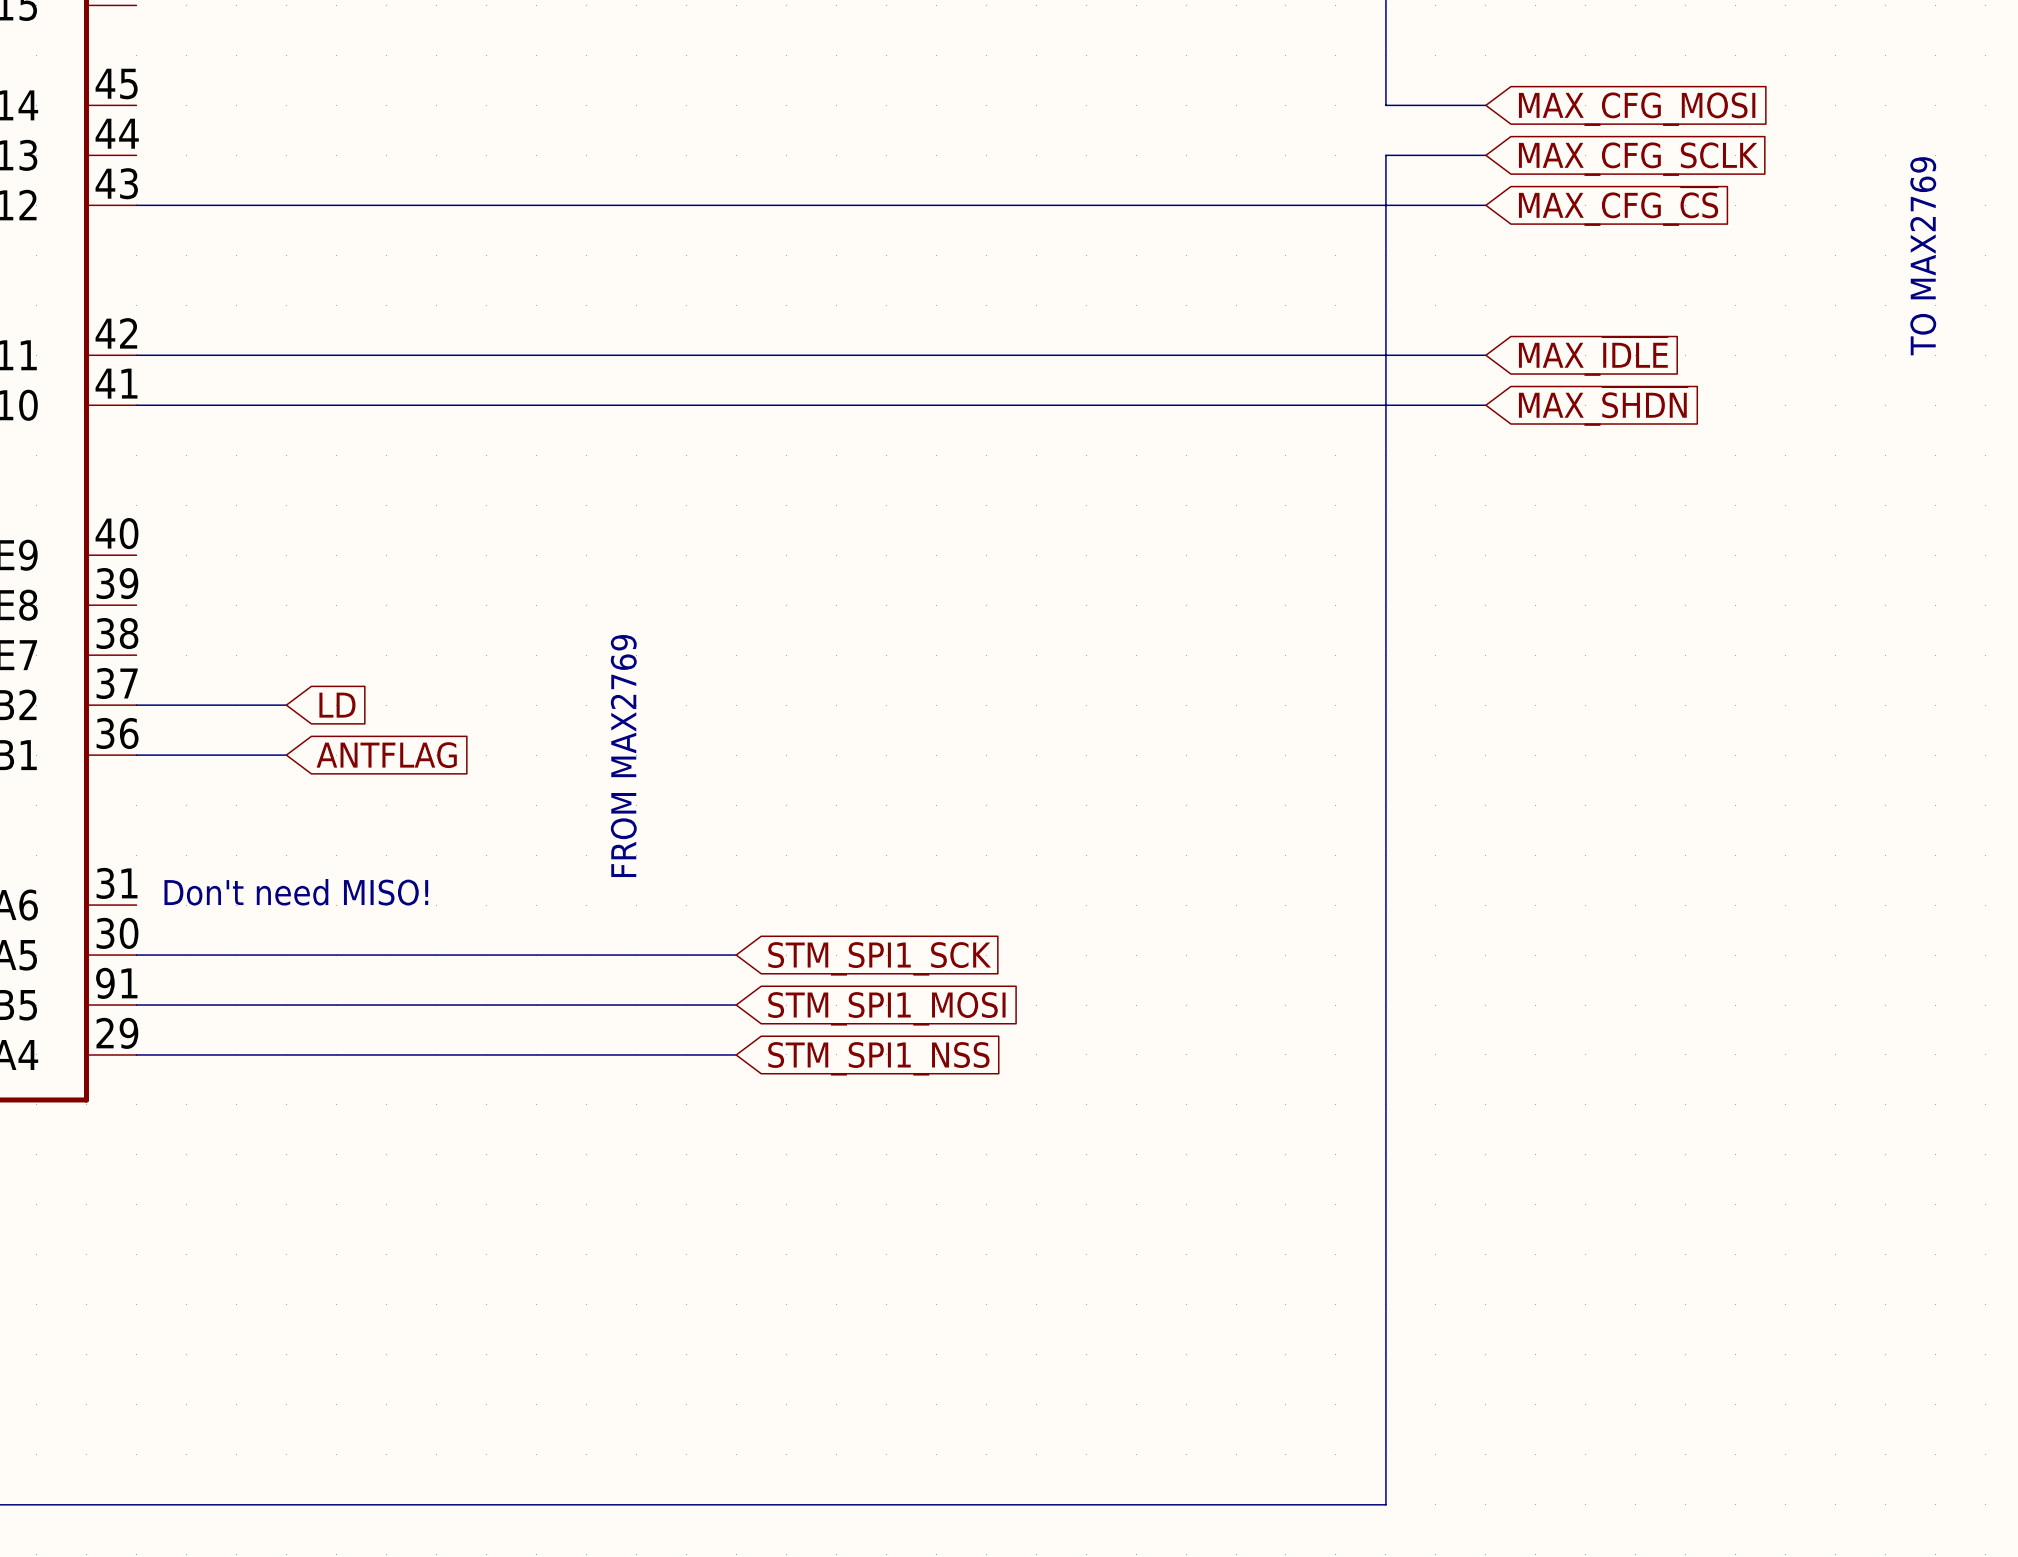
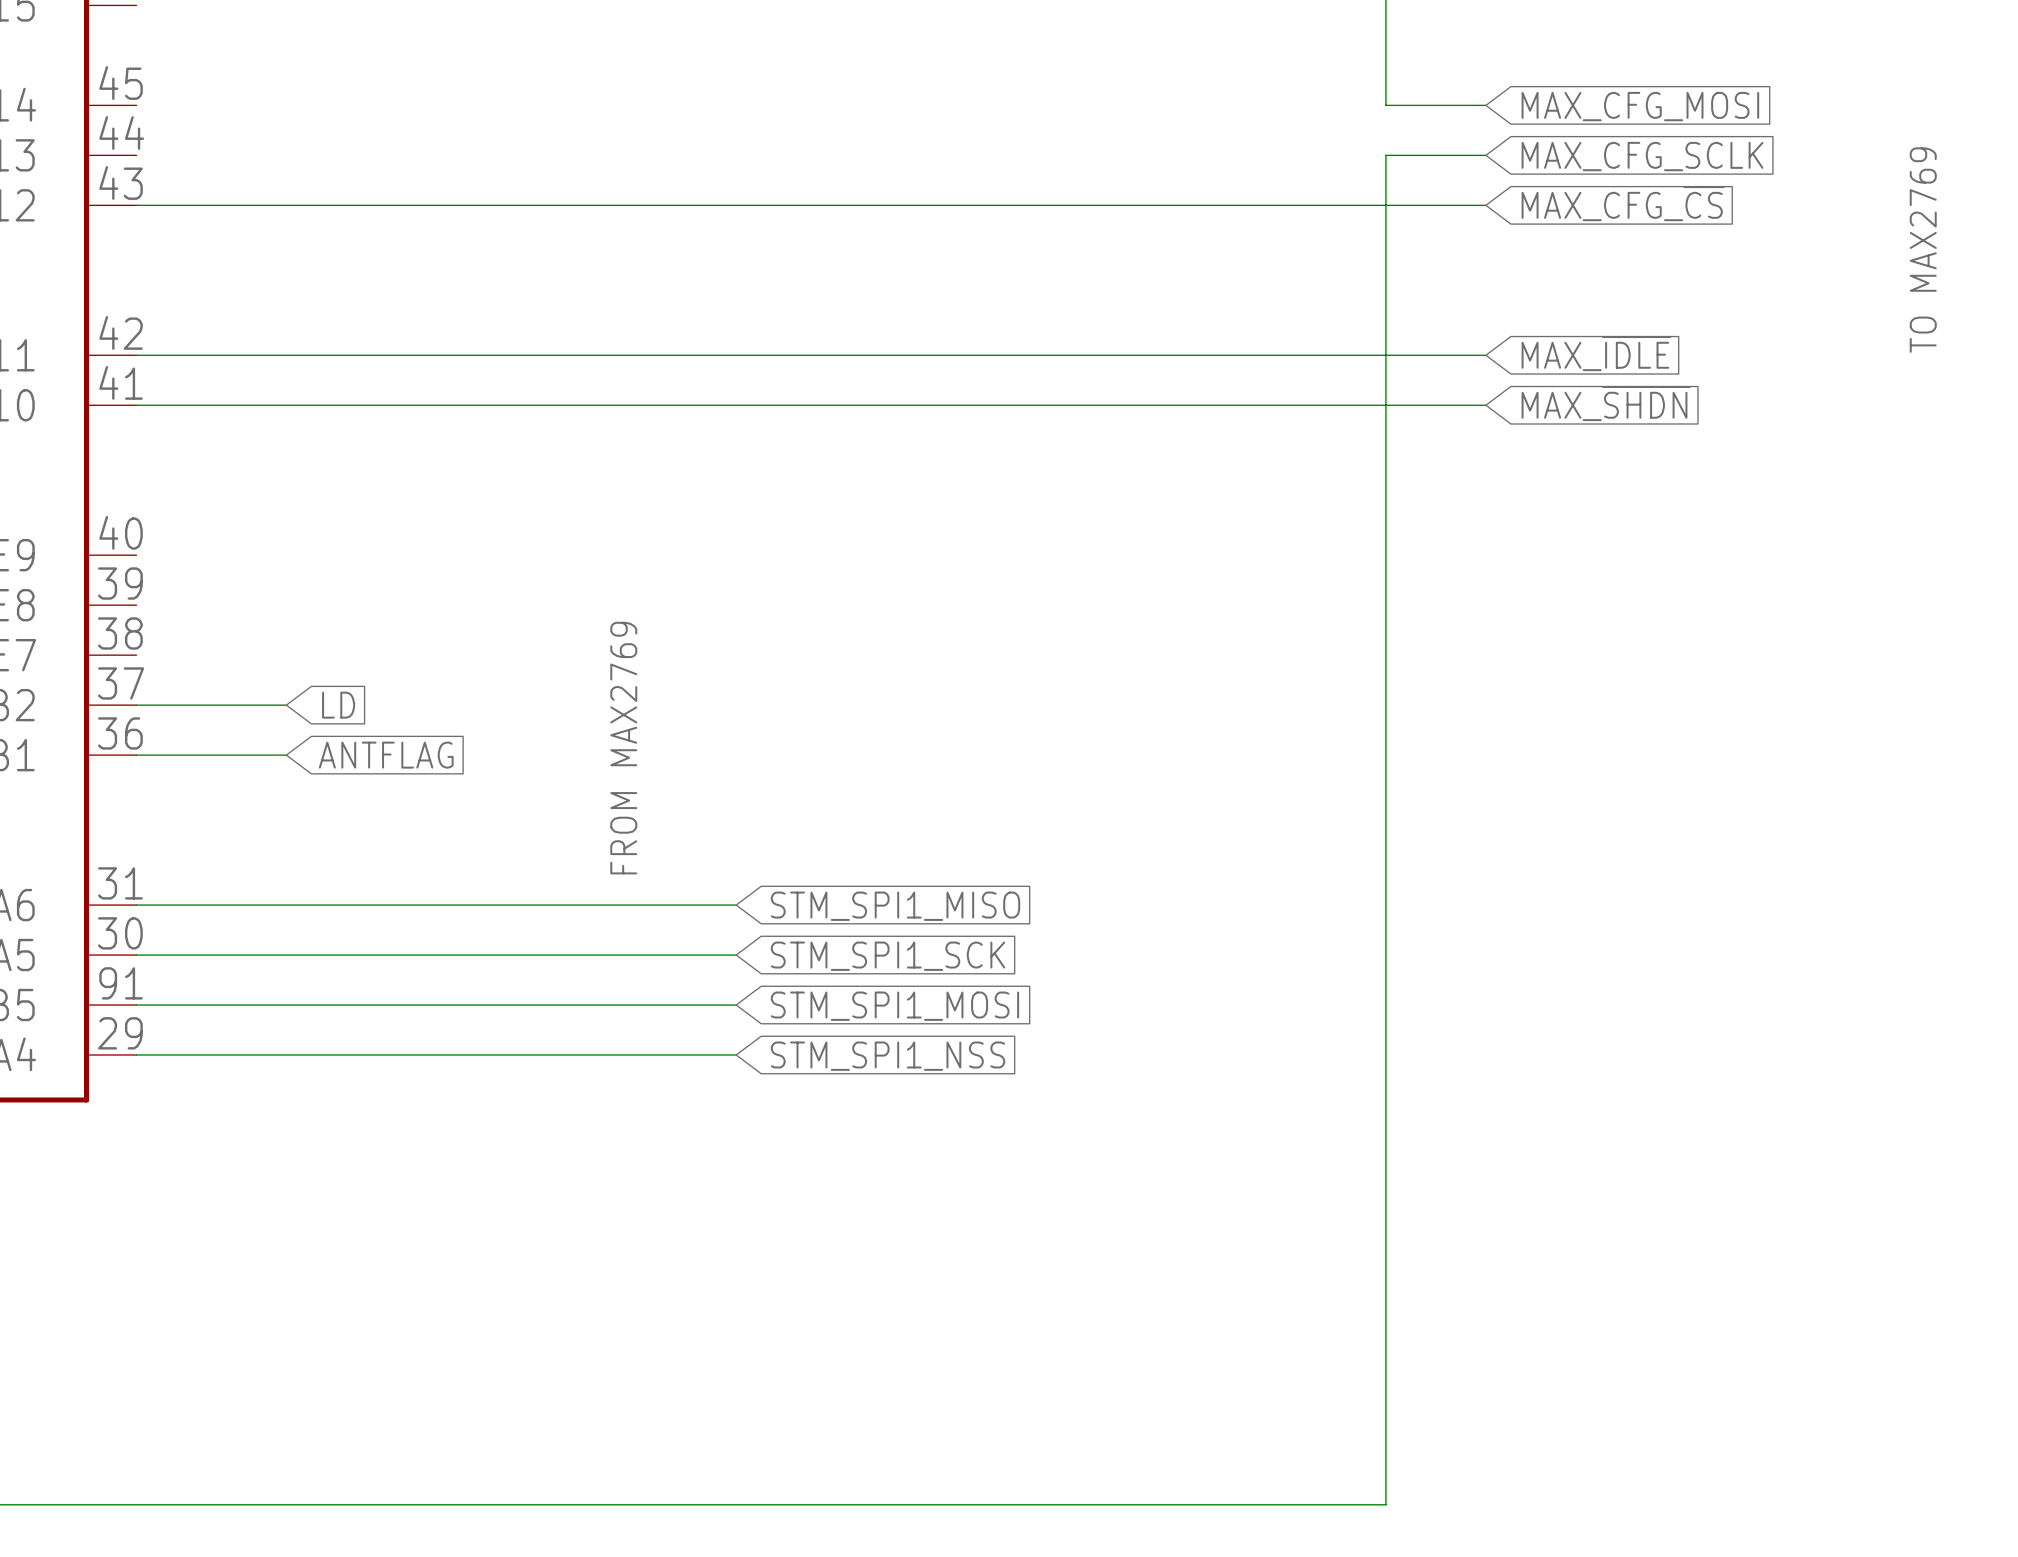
text: Don't need MISO! (296, 892) -> none
wire: none -> (136, 905) (736, 905)
global label: none -> STM_SPI1_MISO (895, 906)

